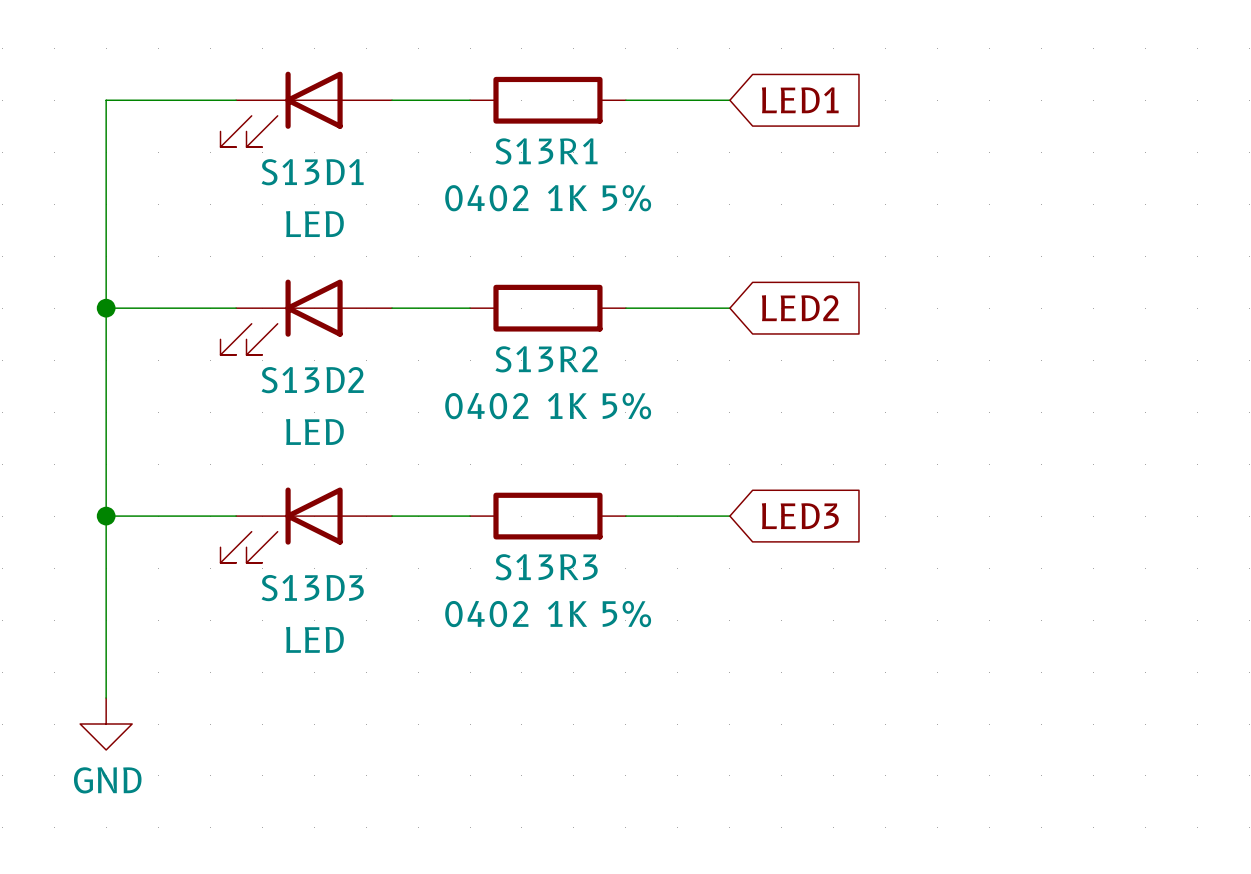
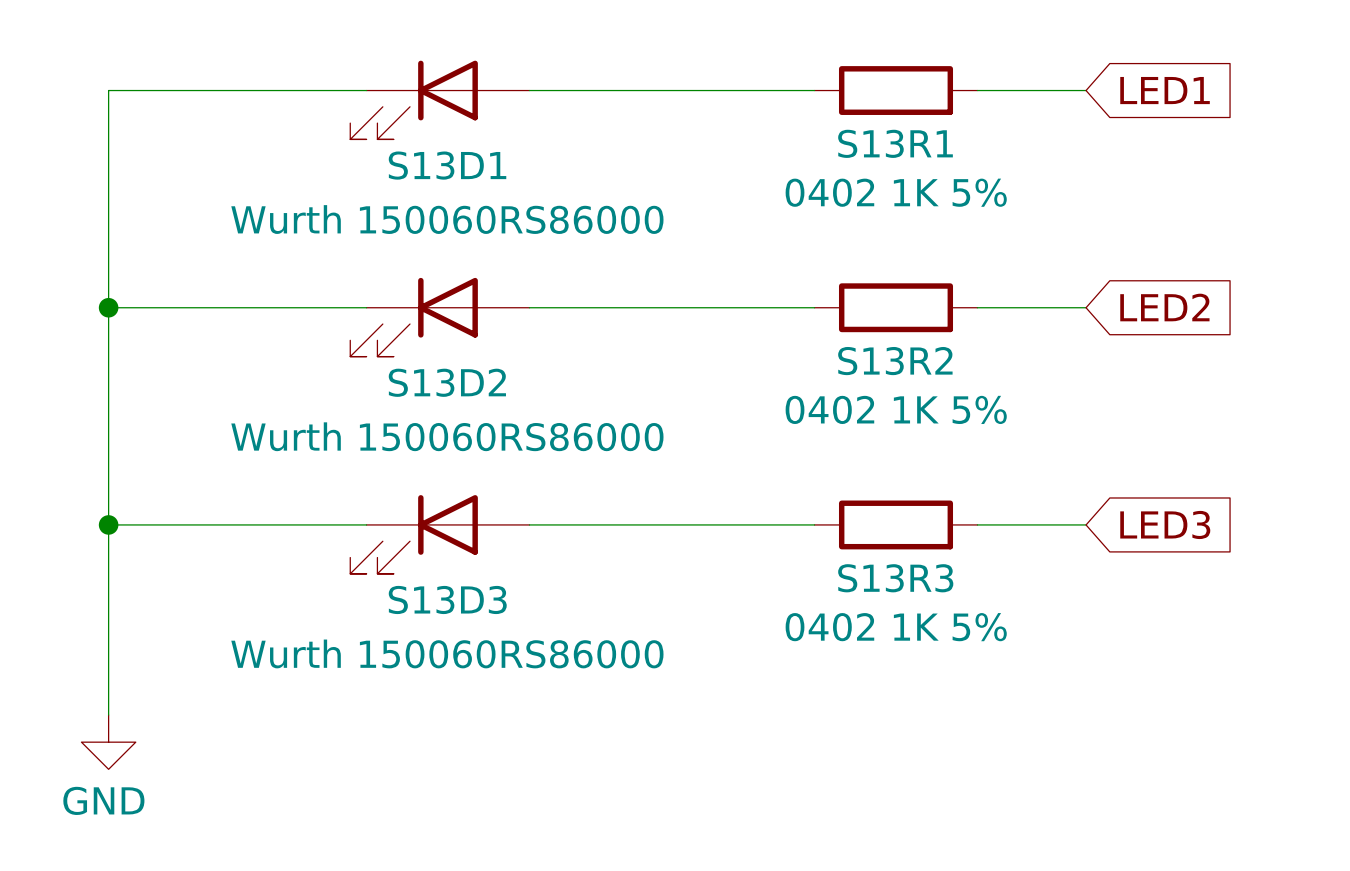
wire: none -> (529, 90) (651, 90)
S13R1 position: (547, 100) -> (896, 90)
wire: none -> (760, 90) (814, 90)
global label position: LED1 (800, 100) -> LED1 (1165, 90)
wire: none -> (977, 90) (1086, 90)
S13D1 position: (306, 109) -> (439, 100)
S13D1 value: LED (314, 224) -> Wurth 150060RS86000 (447, 219)
wire: none -> (529, 307) (651, 307)
S13R2 position: (547, 308) -> (896, 307)
wire: none -> (760, 307) (814, 307)
global label position: LED2 (800, 308) -> LED2 (1164, 307)
wire: none -> (977, 307) (1086, 307)
S13D2 position: (306, 317) -> (439, 317)
S13D2 value: LED (314, 431) -> Wurth 150060RS86000 (447, 436)
wire: none -> (529, 524) (651, 524)
S13R3 position: (547, 516) -> (896, 524)
wire: none -> (760, 524) (814, 524)
global label position: LED3 (800, 516) -> LED3 (1165, 524)
wire: none -> (977, 524) (1086, 524)
S13D3 position: (306, 525) -> (439, 534)
S13D3 value: LED (314, 639) -> Wurth 150060RS86000 (447, 653)

